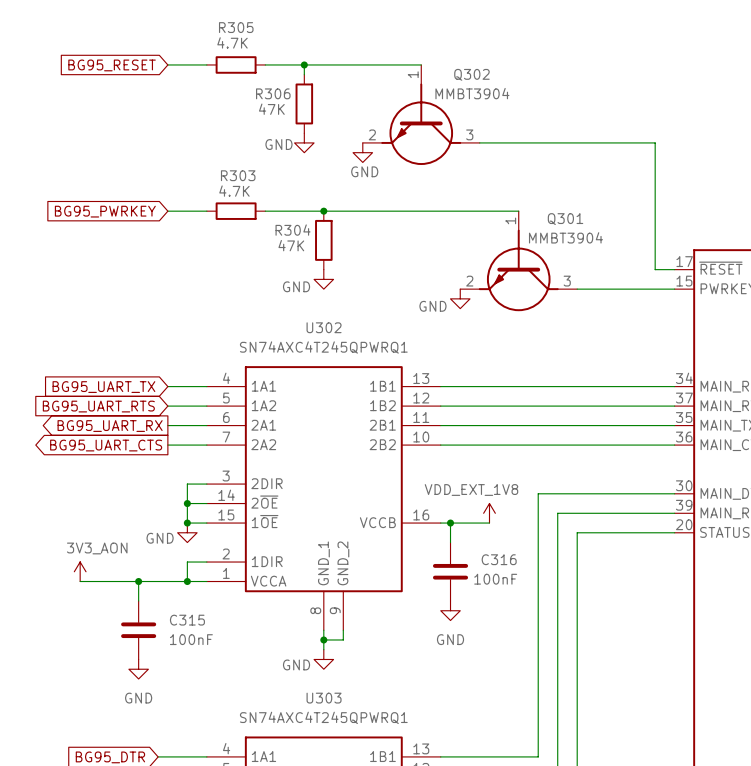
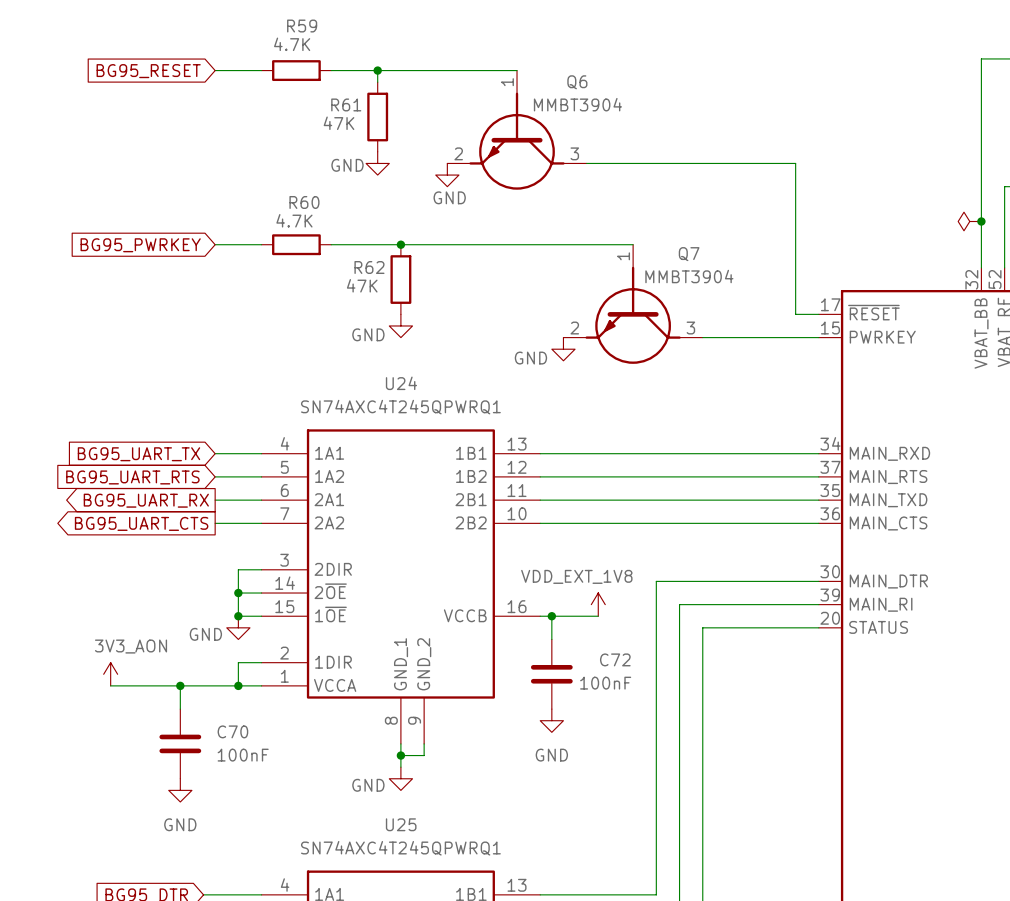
R305 name: R305 (236, 27) -> R59 (302, 26)
Q302 name: Q302 (471, 74) -> Q6 (577, 82)
R306 name: R306 (273, 93) -> R61 (346, 104)
R303 name: R303 (238, 175) -> R60 (304, 202)
Q301 name: Q301 (565, 219) -> Q7 (689, 254)
R304 name: R304 (293, 230) -> R62 (369, 267)
U302 name: U302 (324, 327) -> U24 (401, 383)
C316 name: C316 (499, 559) -> C72 (615, 659)
C315 name: C315 (187, 620) -> C70 (232, 731)
U303 name: U303 (324, 698) -> U25 (401, 824)

